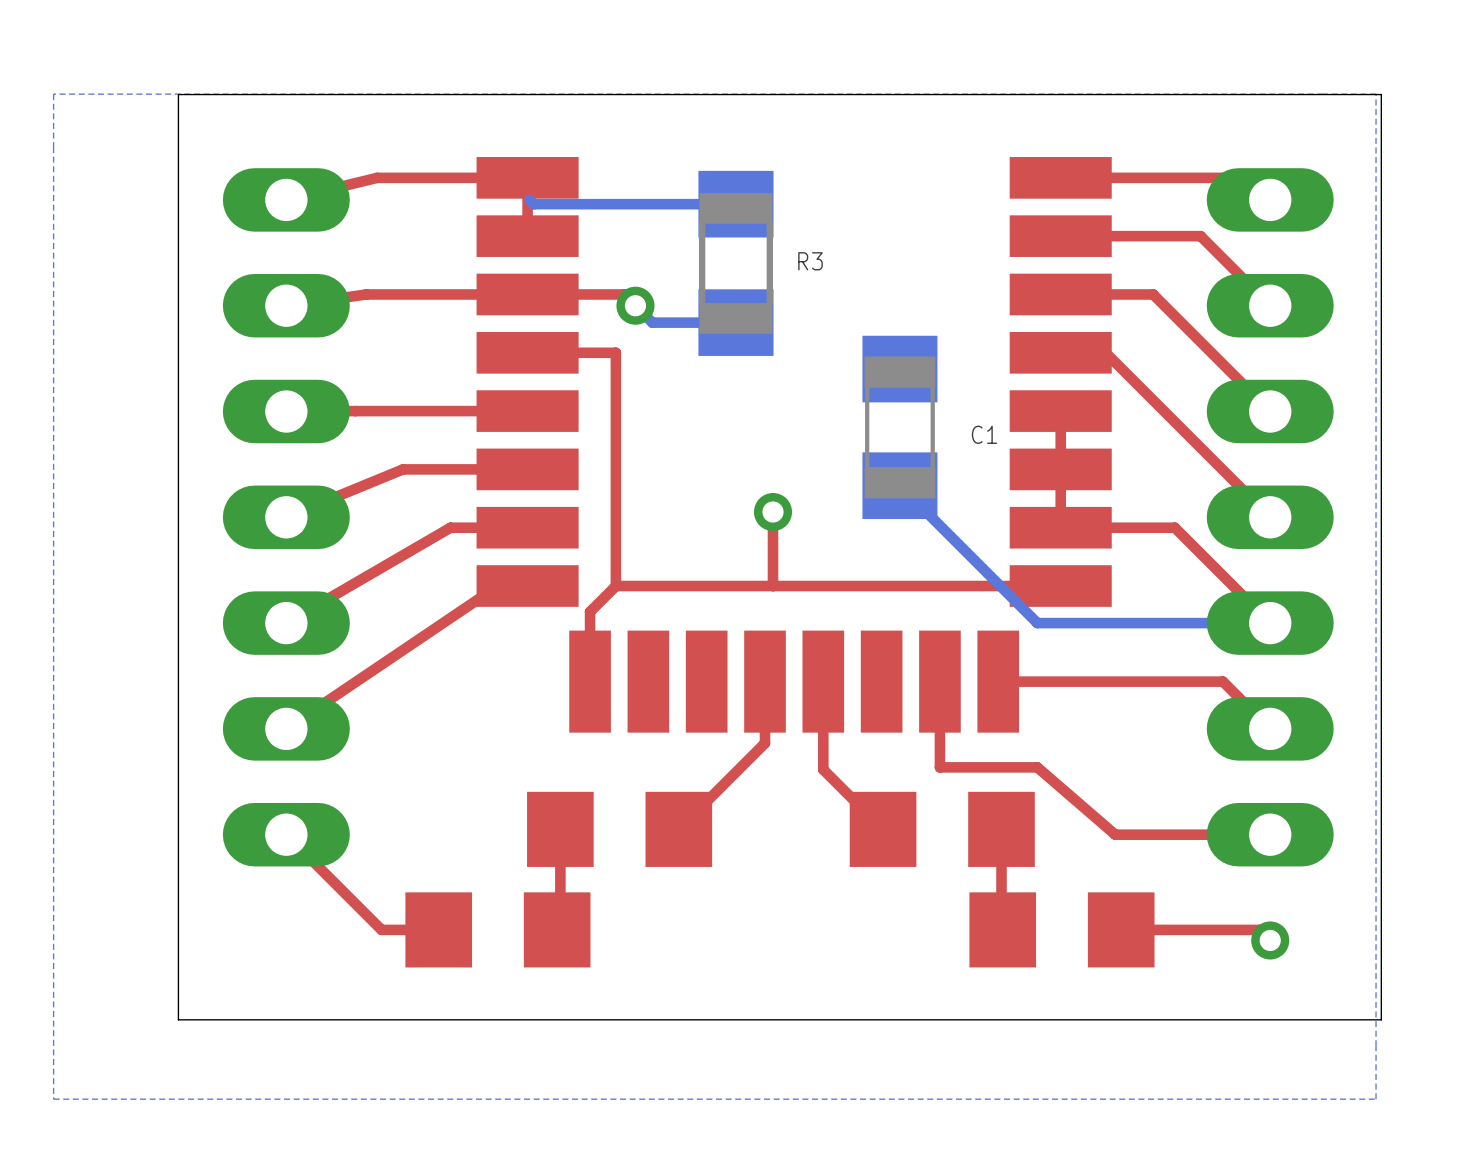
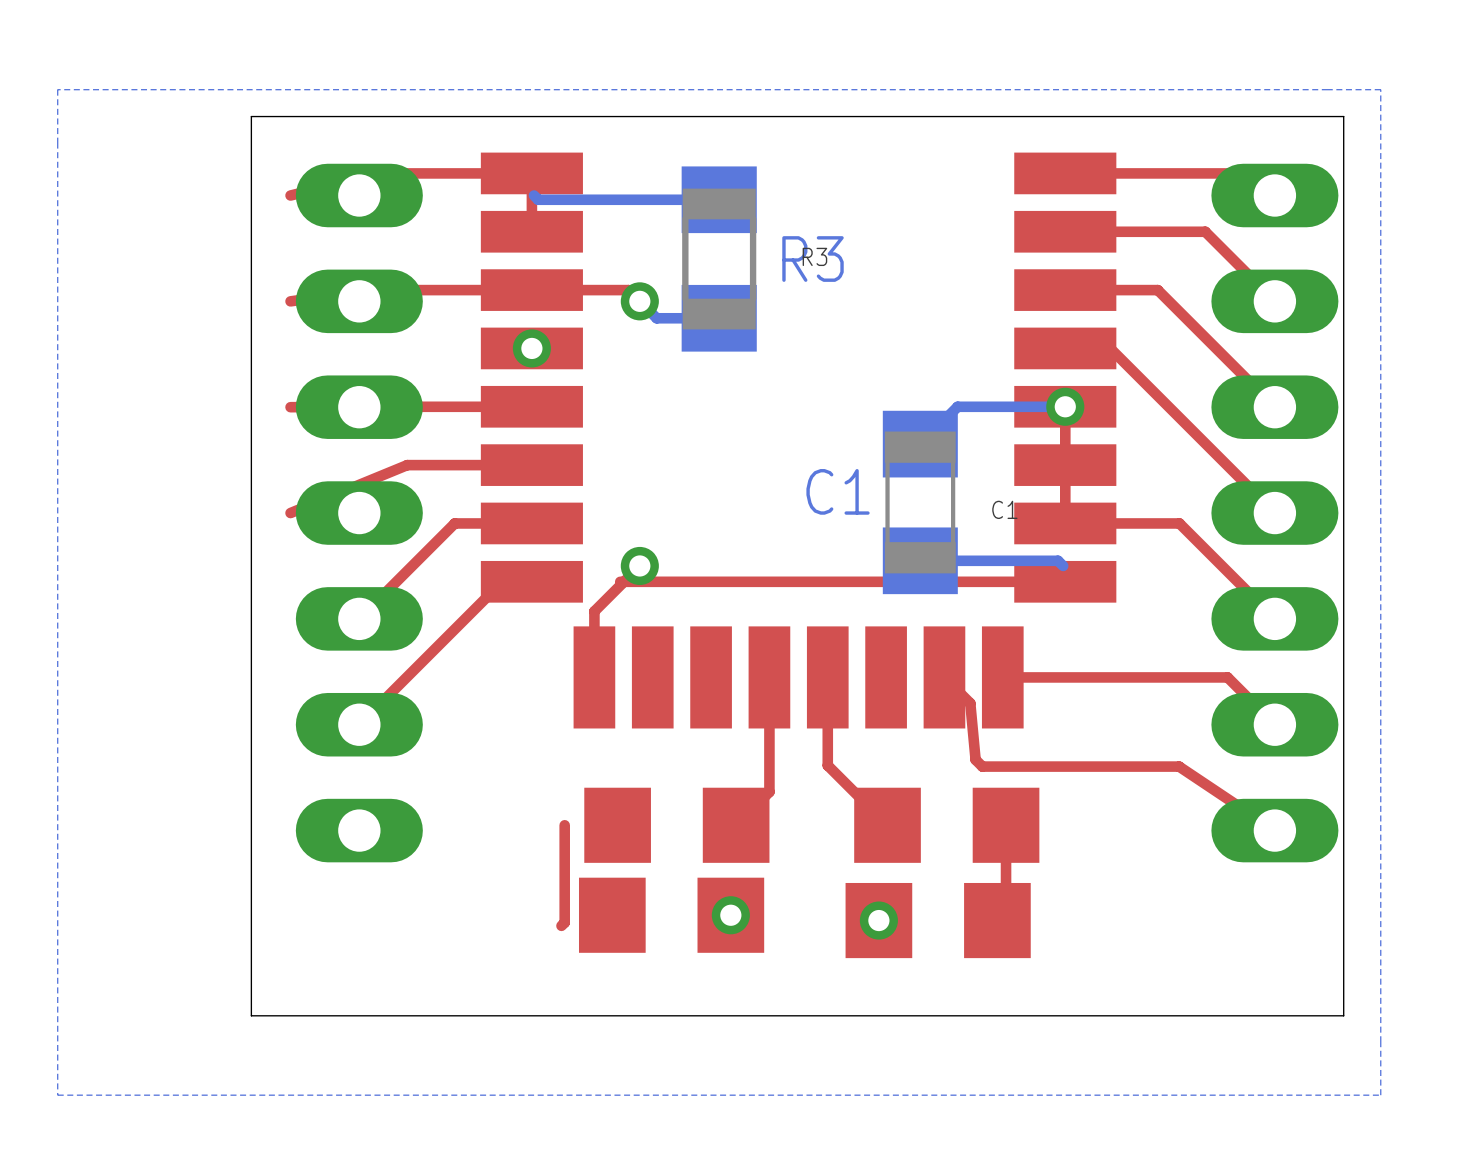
R3 position: (735, 263) -> (719, 259)
text: none -> R3 (813, 259)
top track: (527, 352) (615, 352) (615, 586) (590, 611) (590, 615) -> (639, 565) (594, 611)
via: none -> (531, 348)
bottom track: none -> (1065, 406) (957, 406) (920, 444)
via: none -> (1065, 406)
C1 position: (899, 427) -> (920, 502)
bottom track: (899, 485) (1037, 623) (1270, 623) -> none
text: none -> C1 (838, 491)
top track: (773, 512) (773, 586) -> none
via: (773, 512) -> none
part position: (286, 517) -> (359, 513)
top track: (450, 527) (286, 623) -> (454, 523) (359, 618)
bottom track: none -> (920, 560) (1058, 560) (1063, 565)
via: none -> (639, 565)
top track: (497, 586) (286, 728) -> (502, 581) (359, 724)
top track: (939, 681) (939, 767) (1037, 767) (1115, 834) (1270, 834) -> (944, 677) (970, 703) (975, 759) (982, 766) (1179, 766) (1274, 830)
top track: (765, 743) (678, 829) -> (769, 739) (769, 791) (736, 825)
part: (619, 829) -> none
part: none -> (676, 825)
top track: (286, 834) (381, 929) (438, 929) -> none
part: none -> (671, 915)
via: none -> (730, 915)
via: none -> (878, 920)
part: (497, 929) -> none
part position: (1061, 929) -> (938, 920)
top track: (1121, 929) (1259, 929) (1270, 940) -> none
via: (1270, 940) -> none
board edge: (1338, 1019) (1381, 1019) (1381, 94) (178, 94) (178, 1019) (247, 1019) -> (1343, 1015) (1343, 116) (251, 116) (251, 1015)

